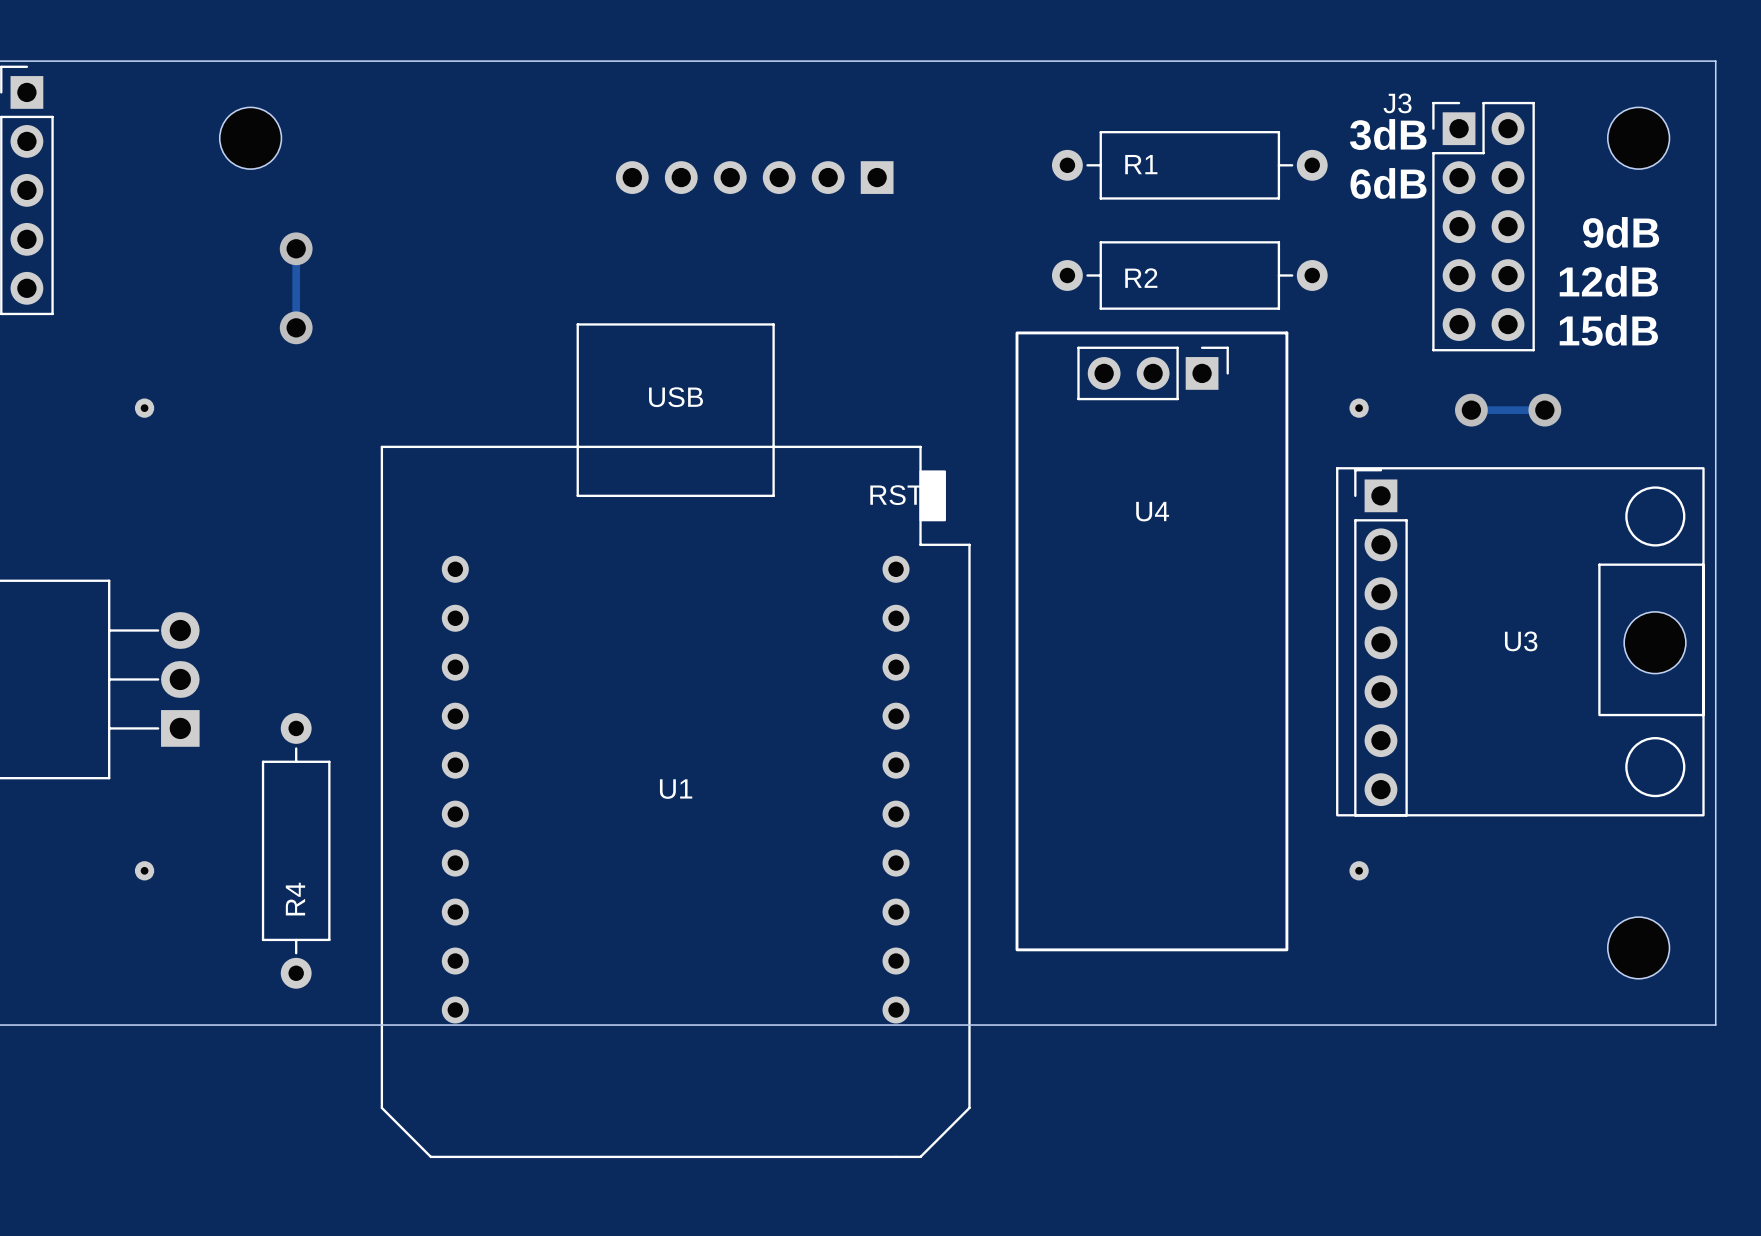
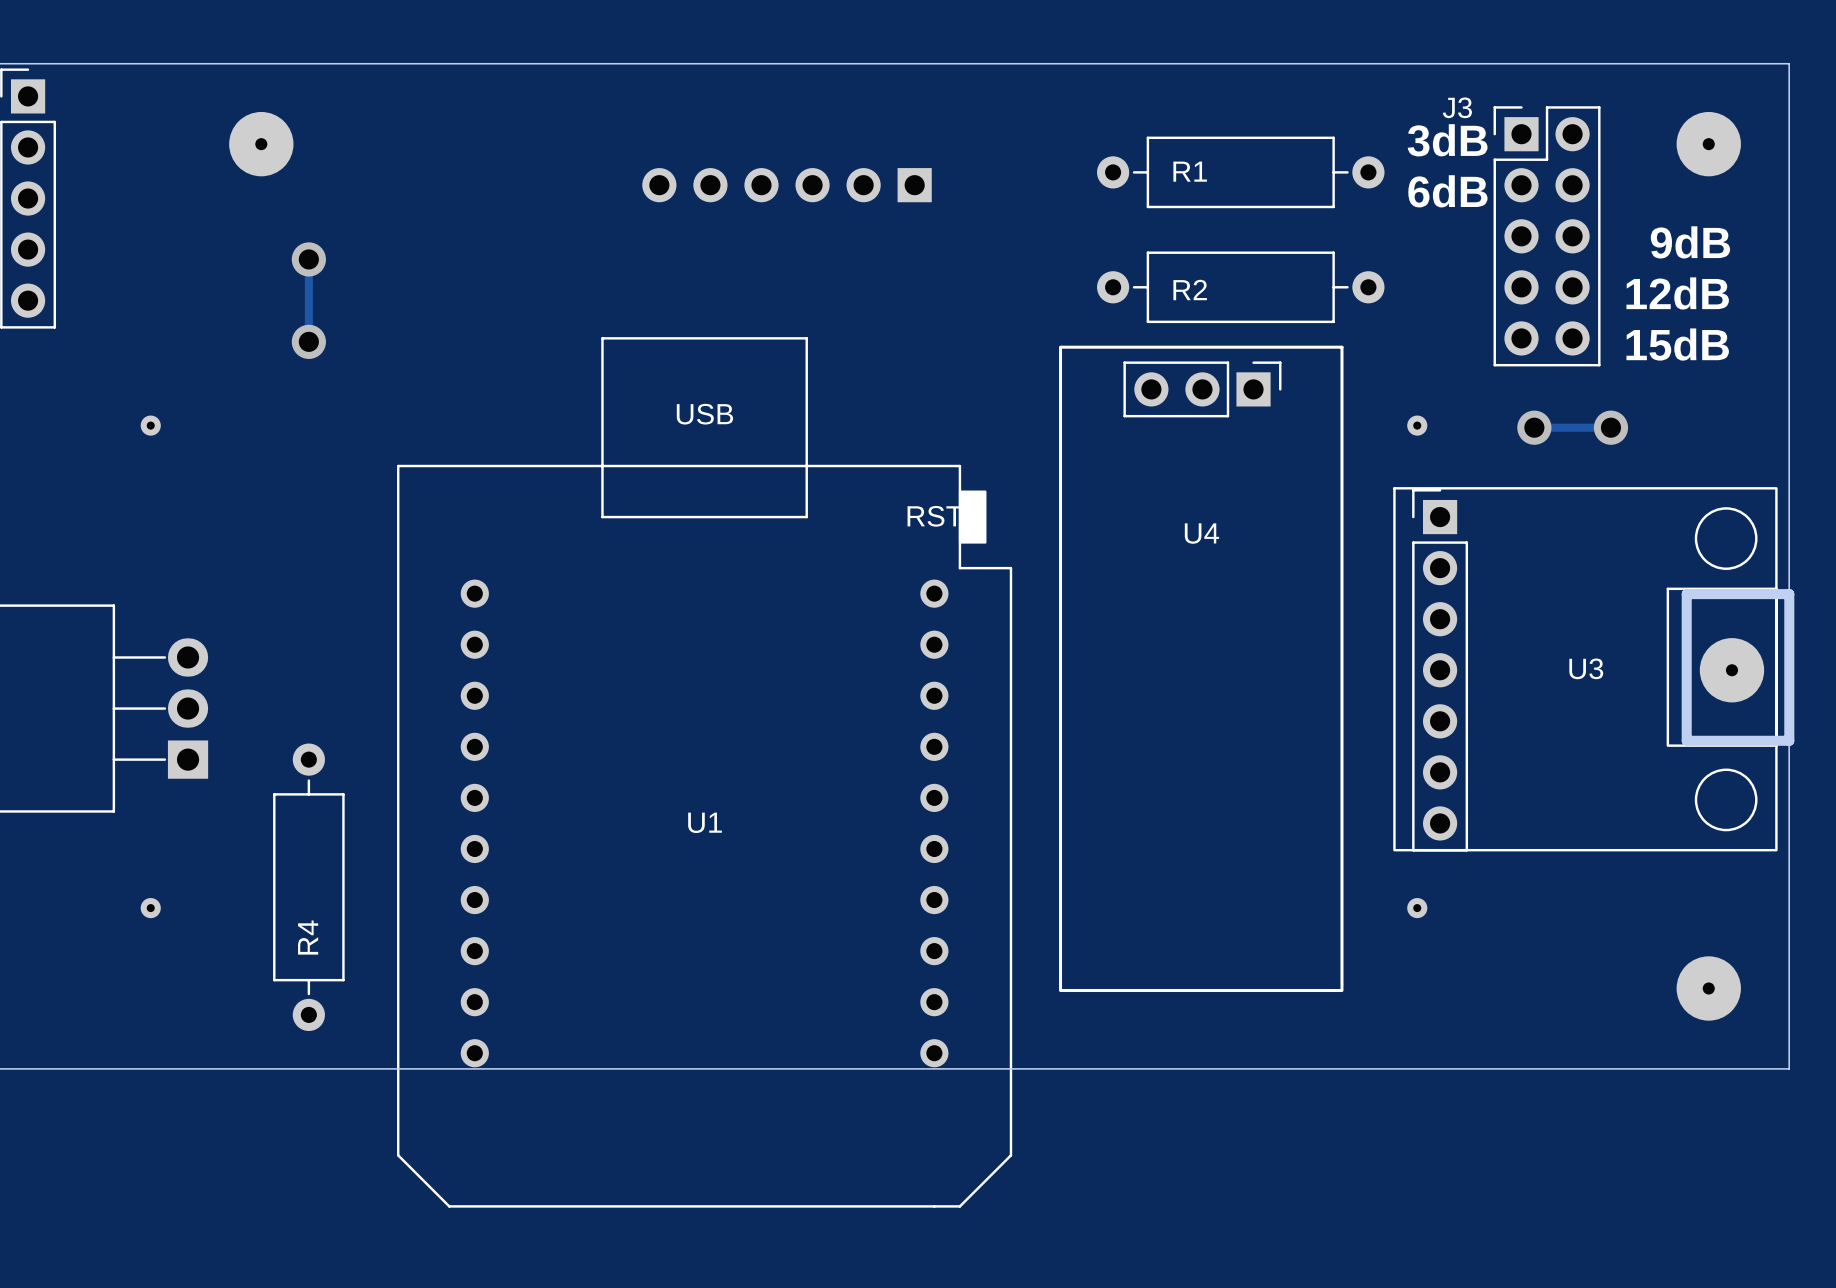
part footprint: [219, 107, 282, 170] -> [229, 111, 294, 177]
part footprint: [1607, 107, 1670, 170] -> [1676, 111, 1741, 177]
board edge: none -> (1686, 594) (1789, 594) (1789, 740) (1686, 740) (1686, 594)
part footprint: [1624, 611, 1686, 674] -> [1699, 638, 1765, 703]
part footprint: [1607, 917, 1670, 979] -> [1676, 956, 1741, 1021]

